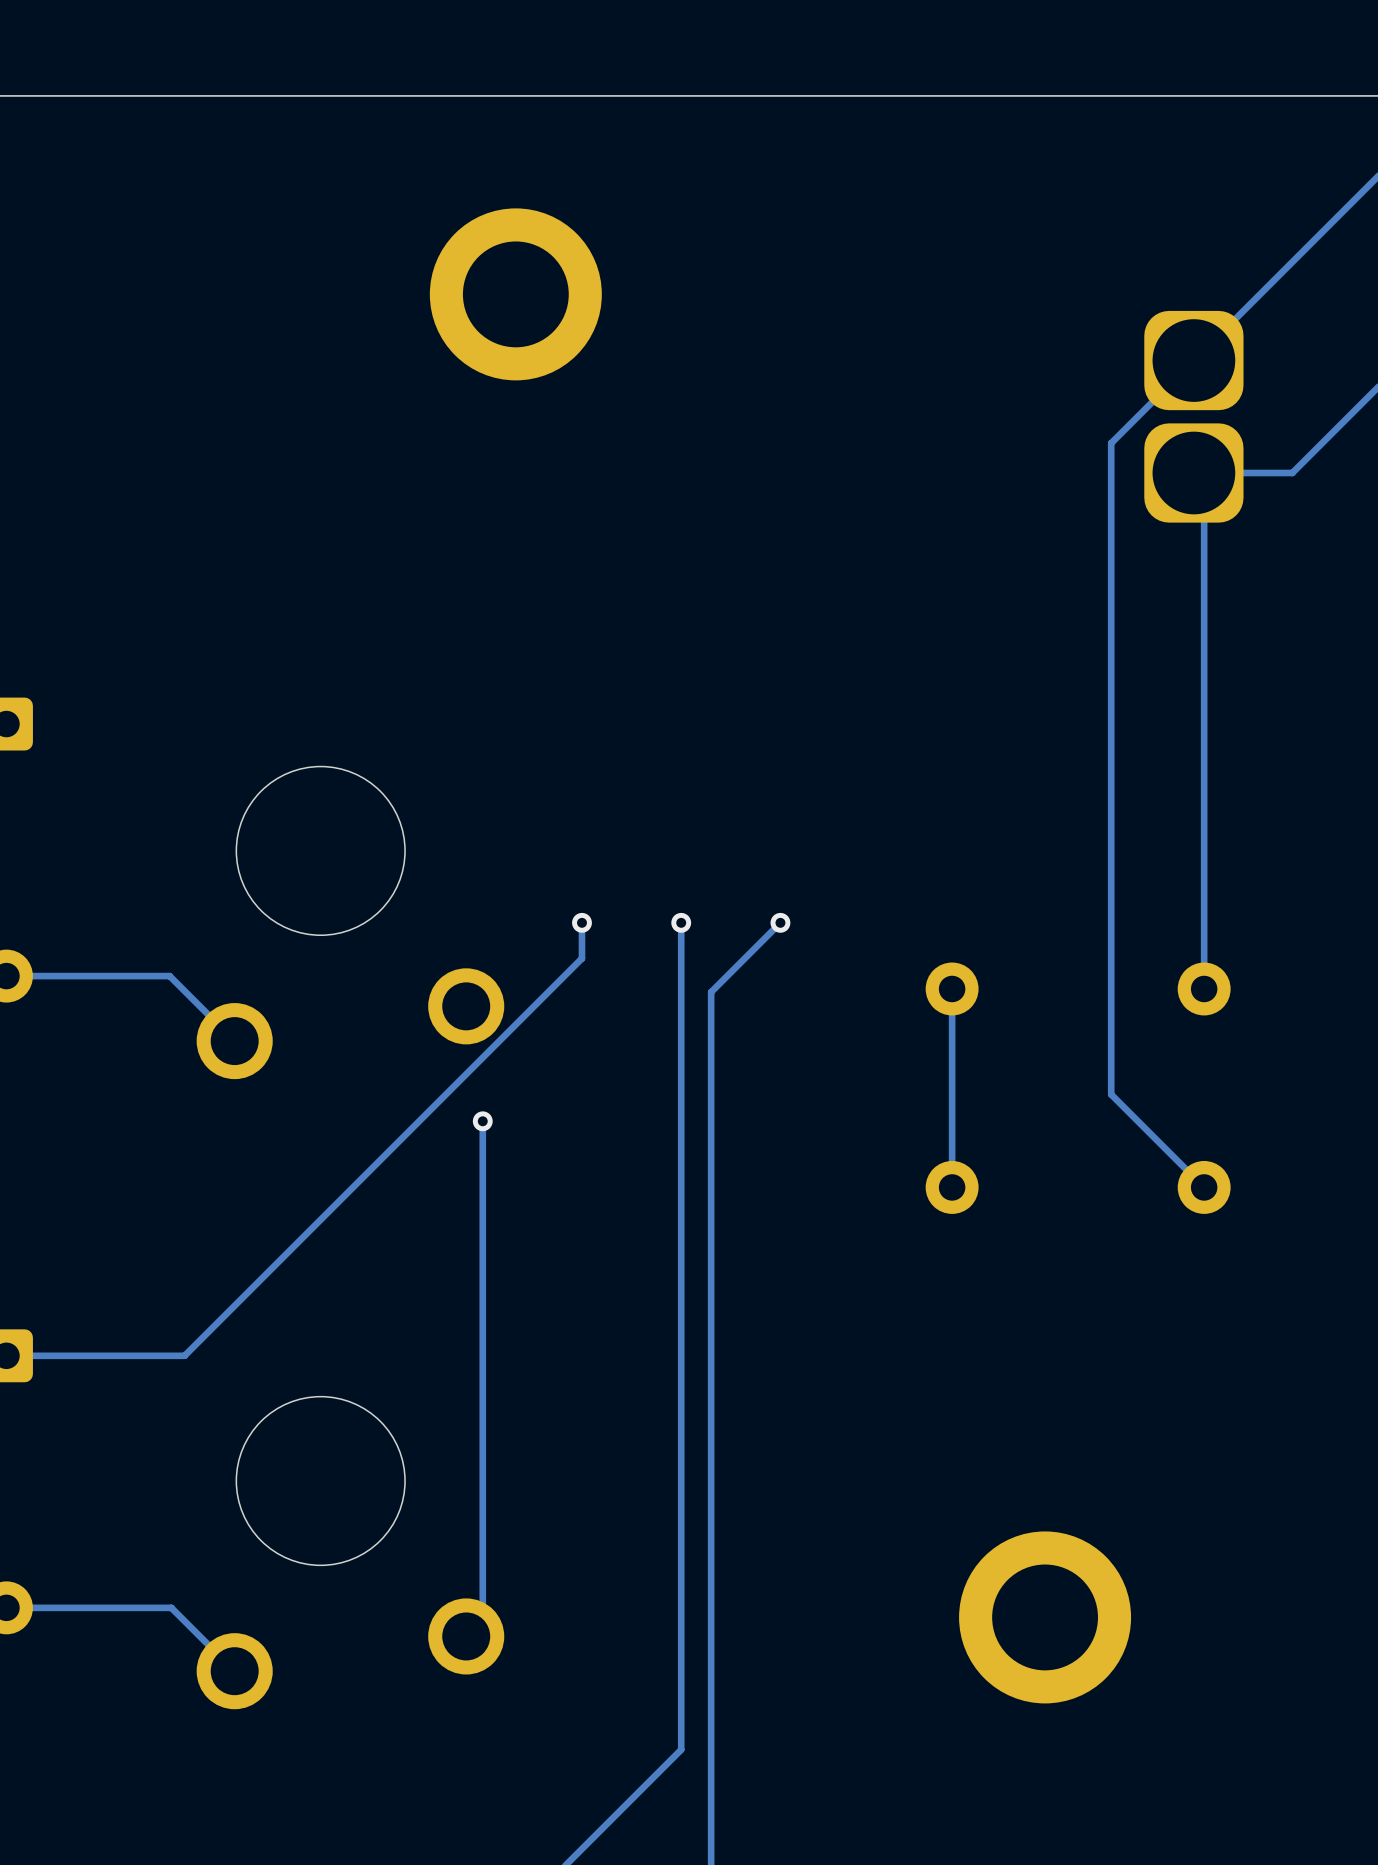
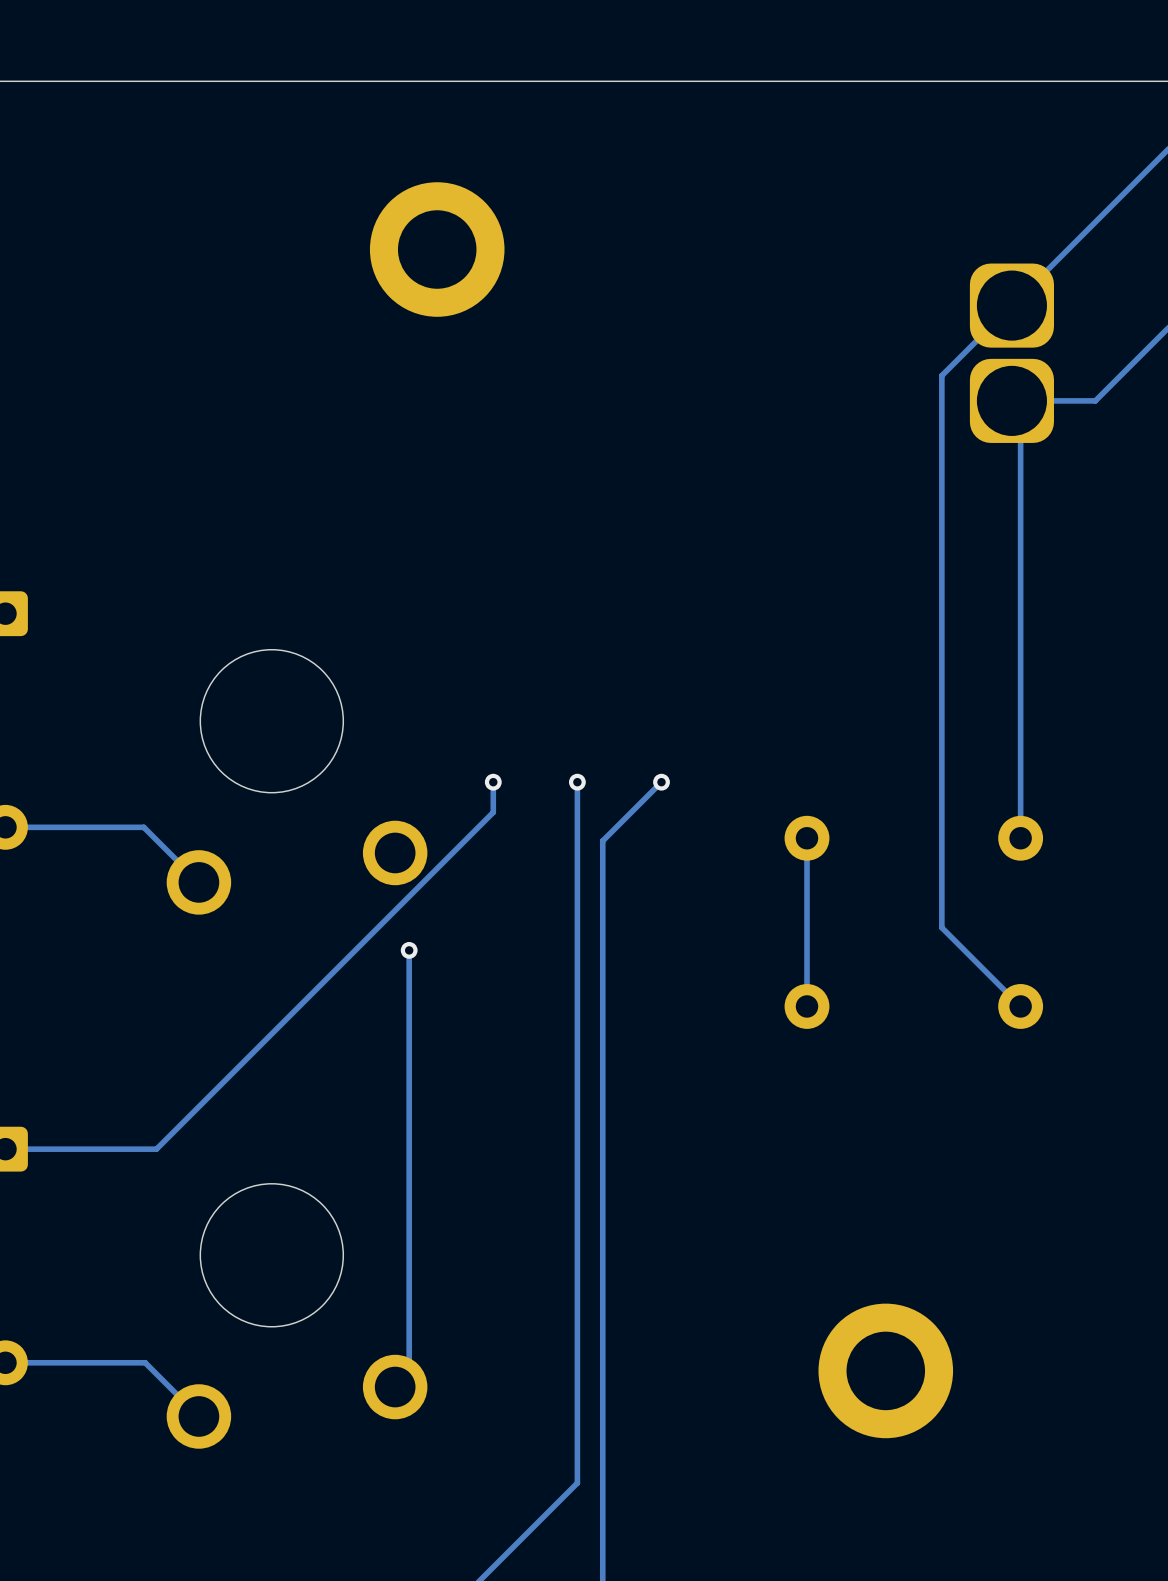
part footprint: [429, 208, 602, 381] -> [369, 182, 505, 317]
part footprint: [959, 1531, 1132, 1704] -> [818, 1303, 954, 1439]

